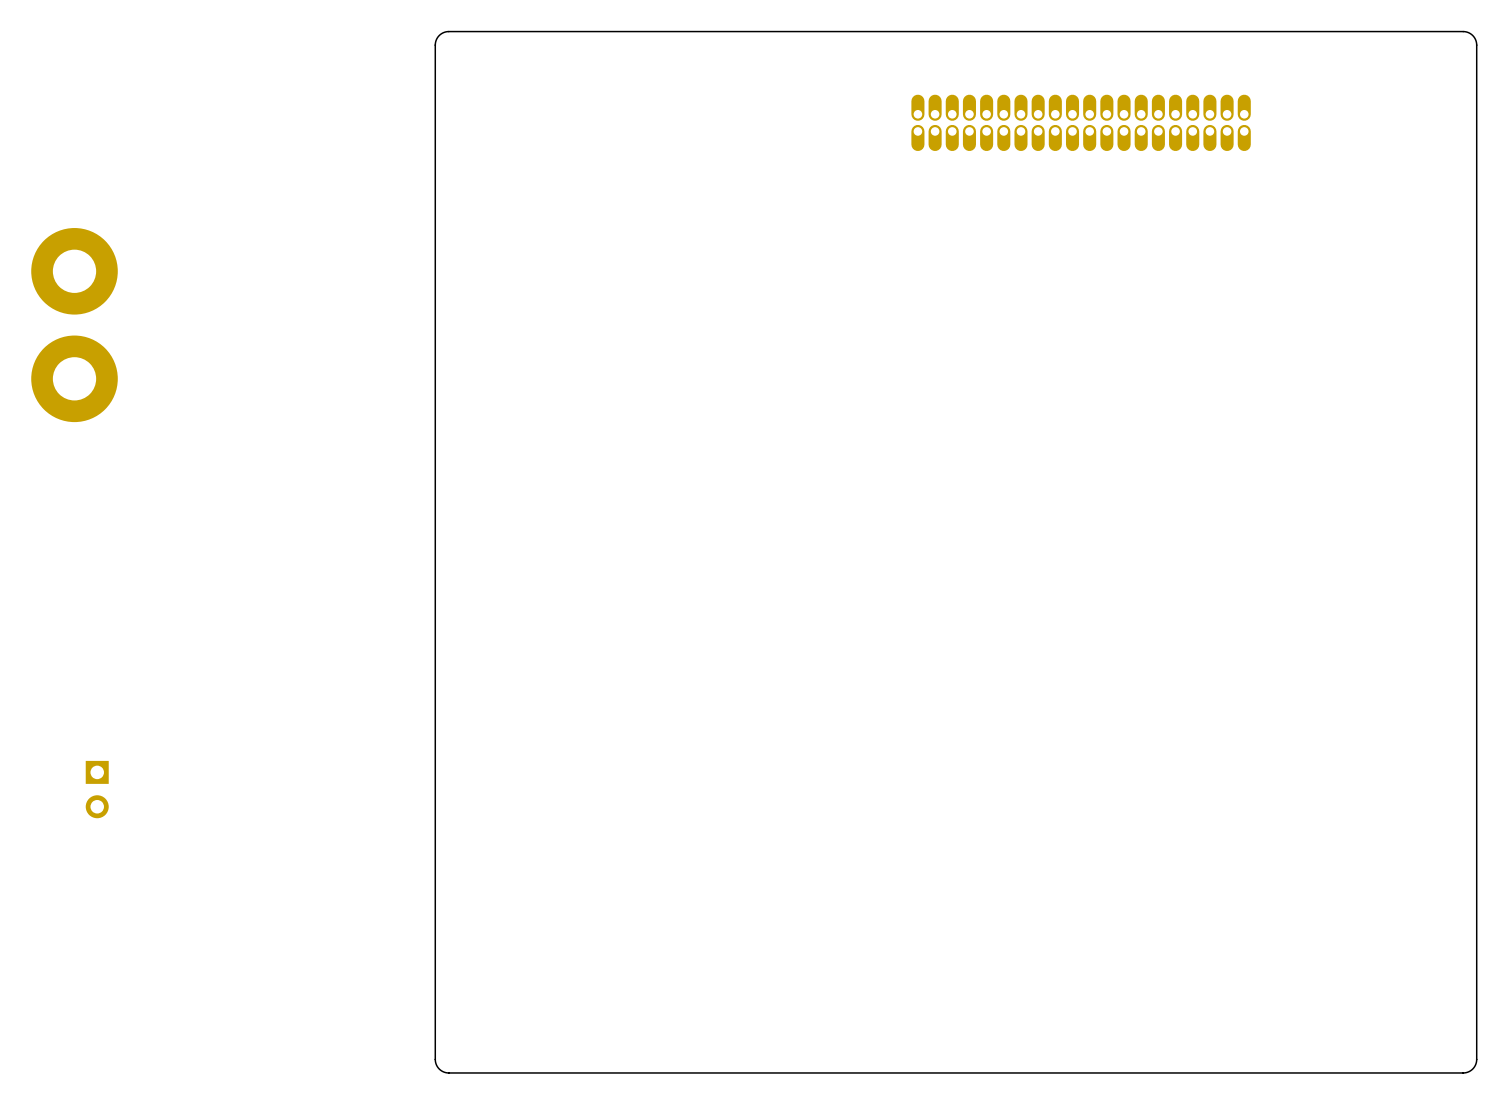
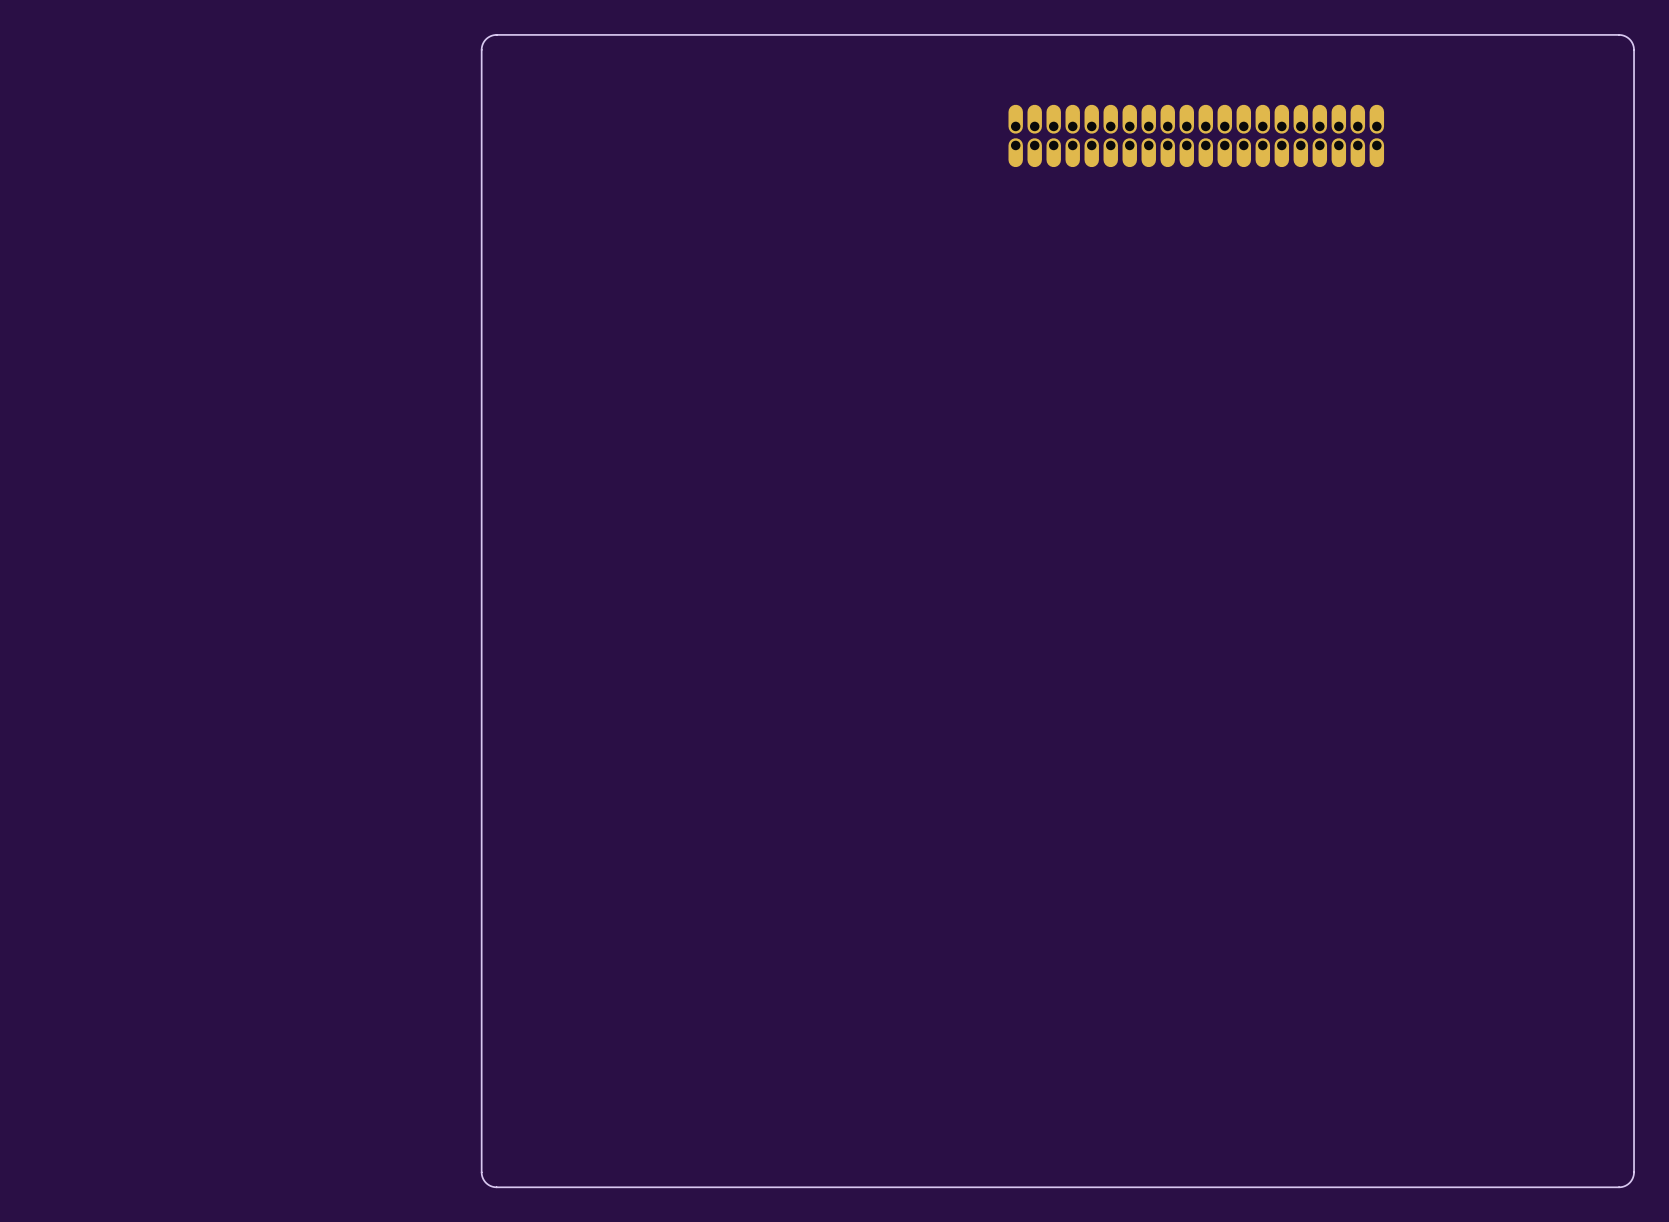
part: (74, 271) -> none
part: (74, 378) -> none
part: (97, 789) -> none

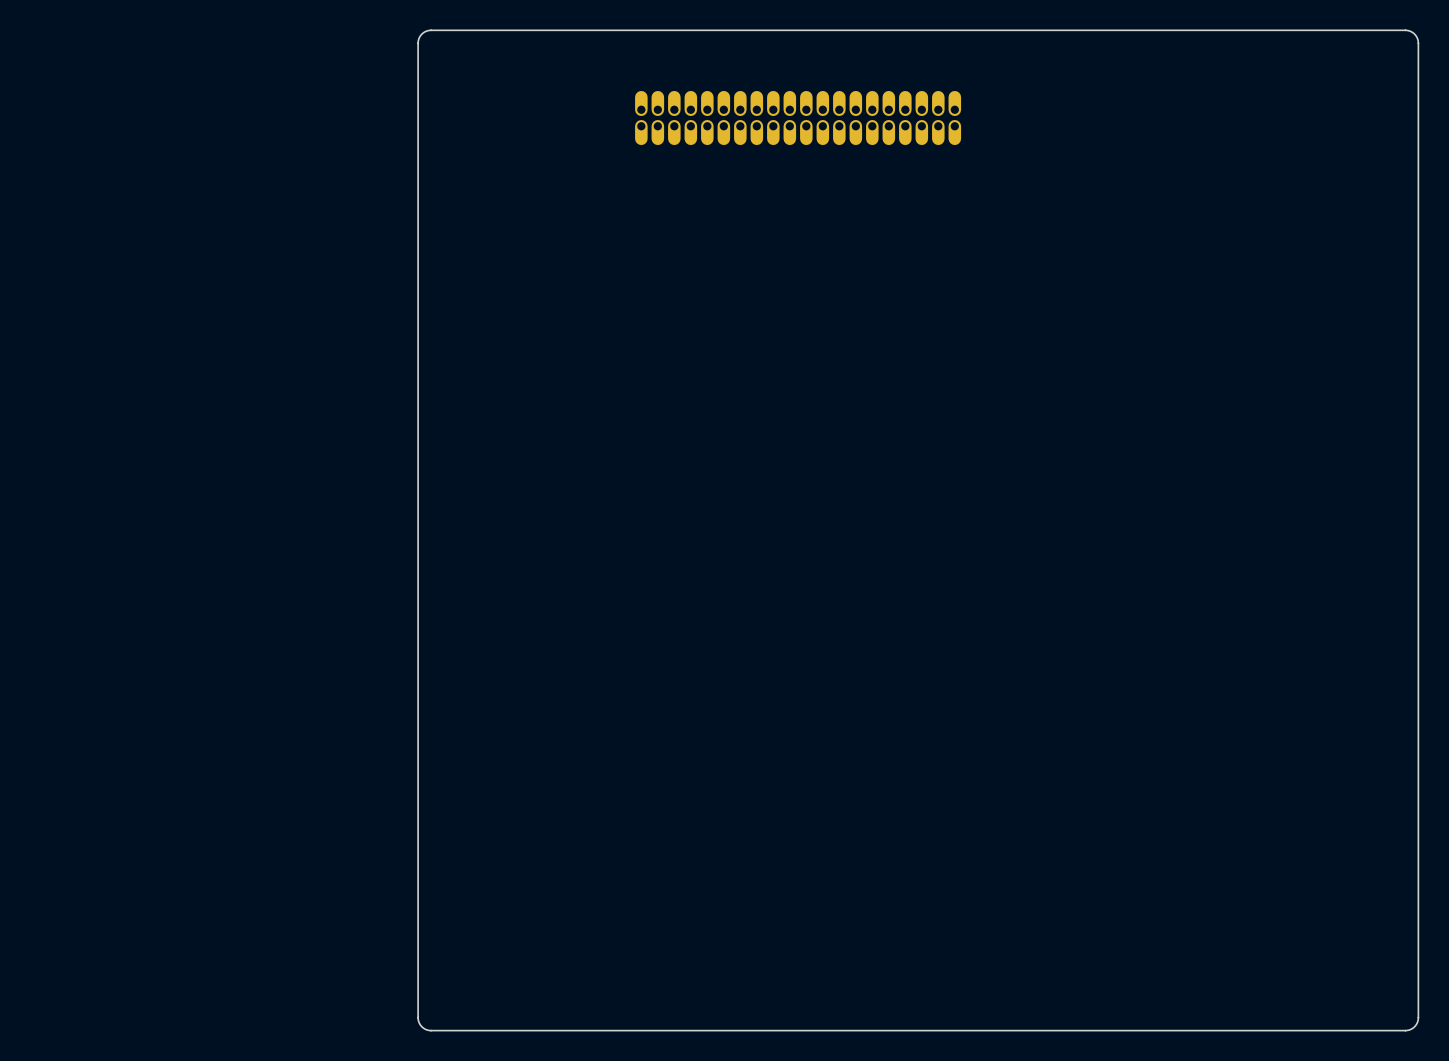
part position: (1196, 135) -> (798, 118)

